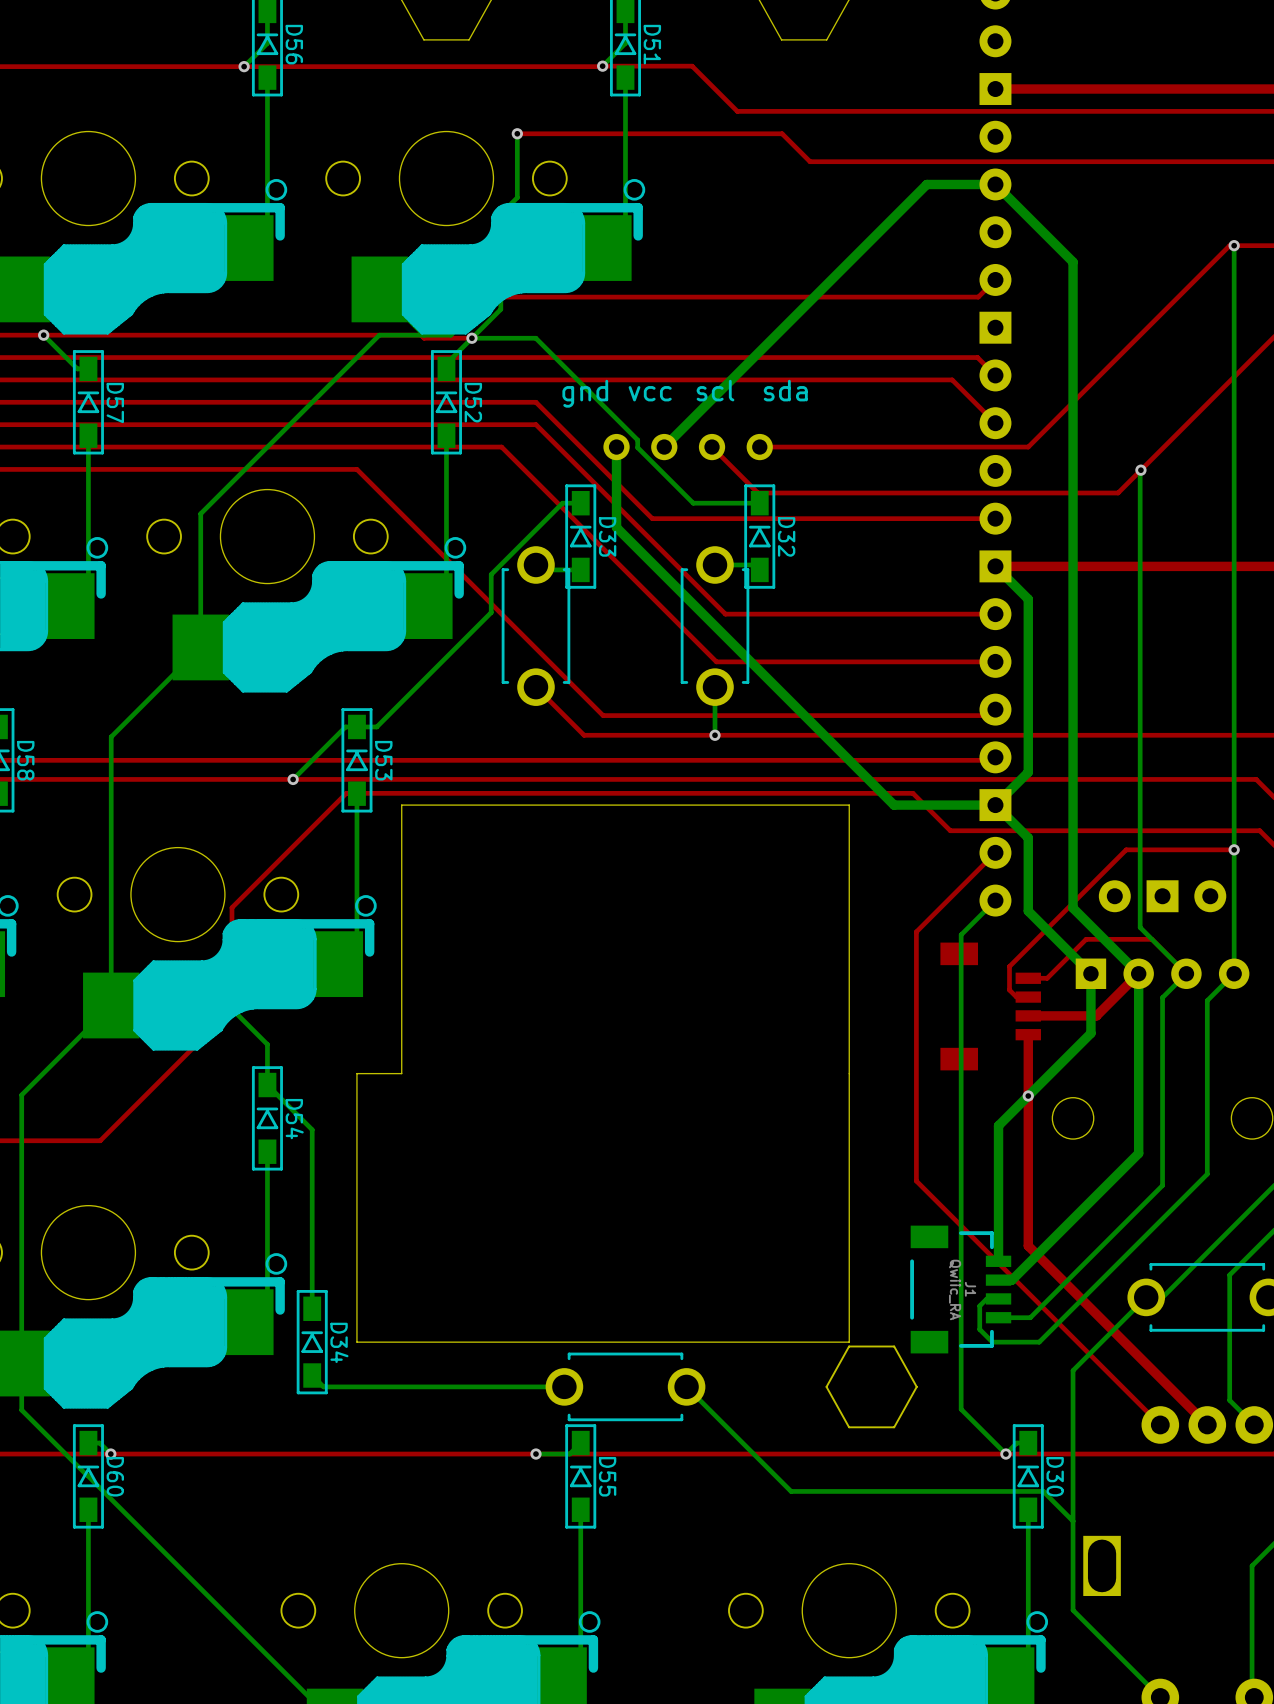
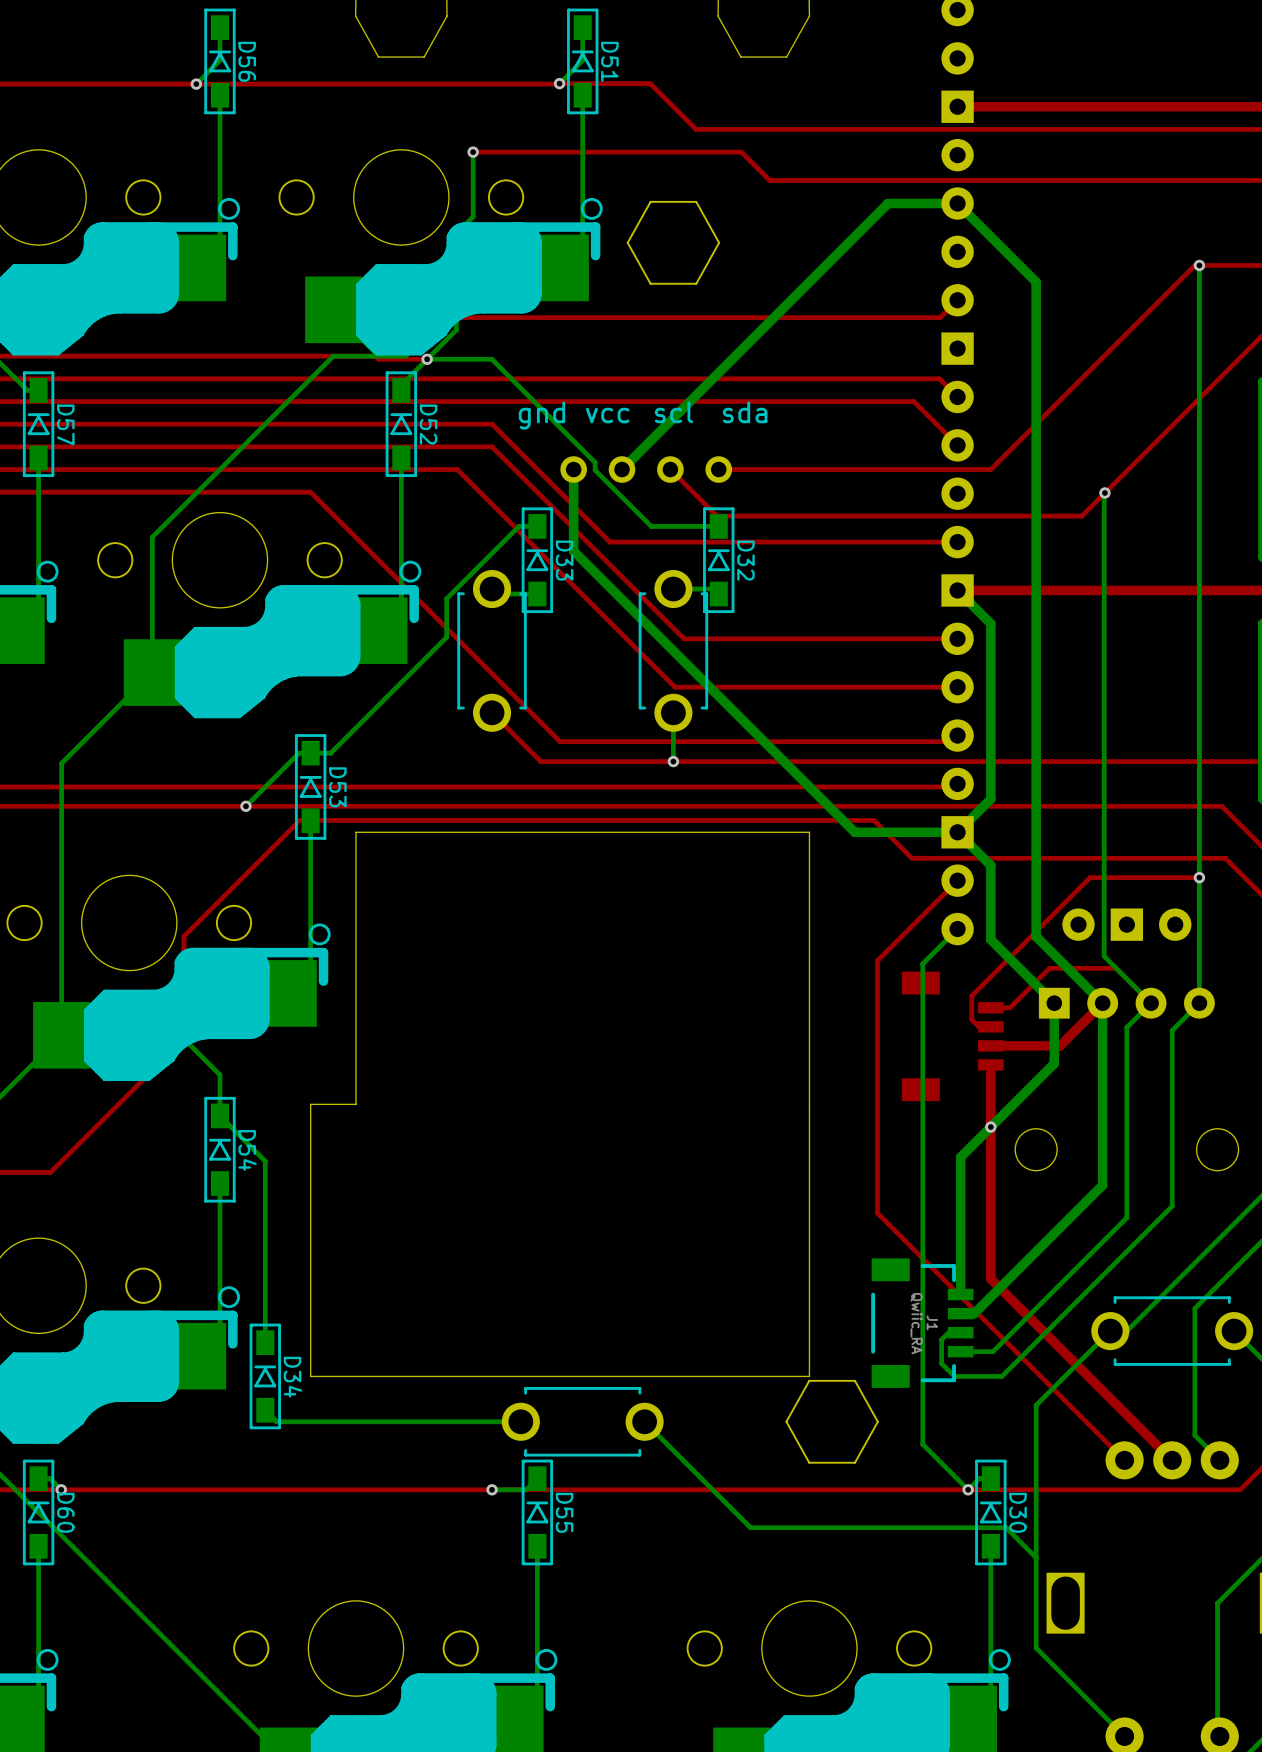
drawing: none -> [626, 200, 721, 285]

